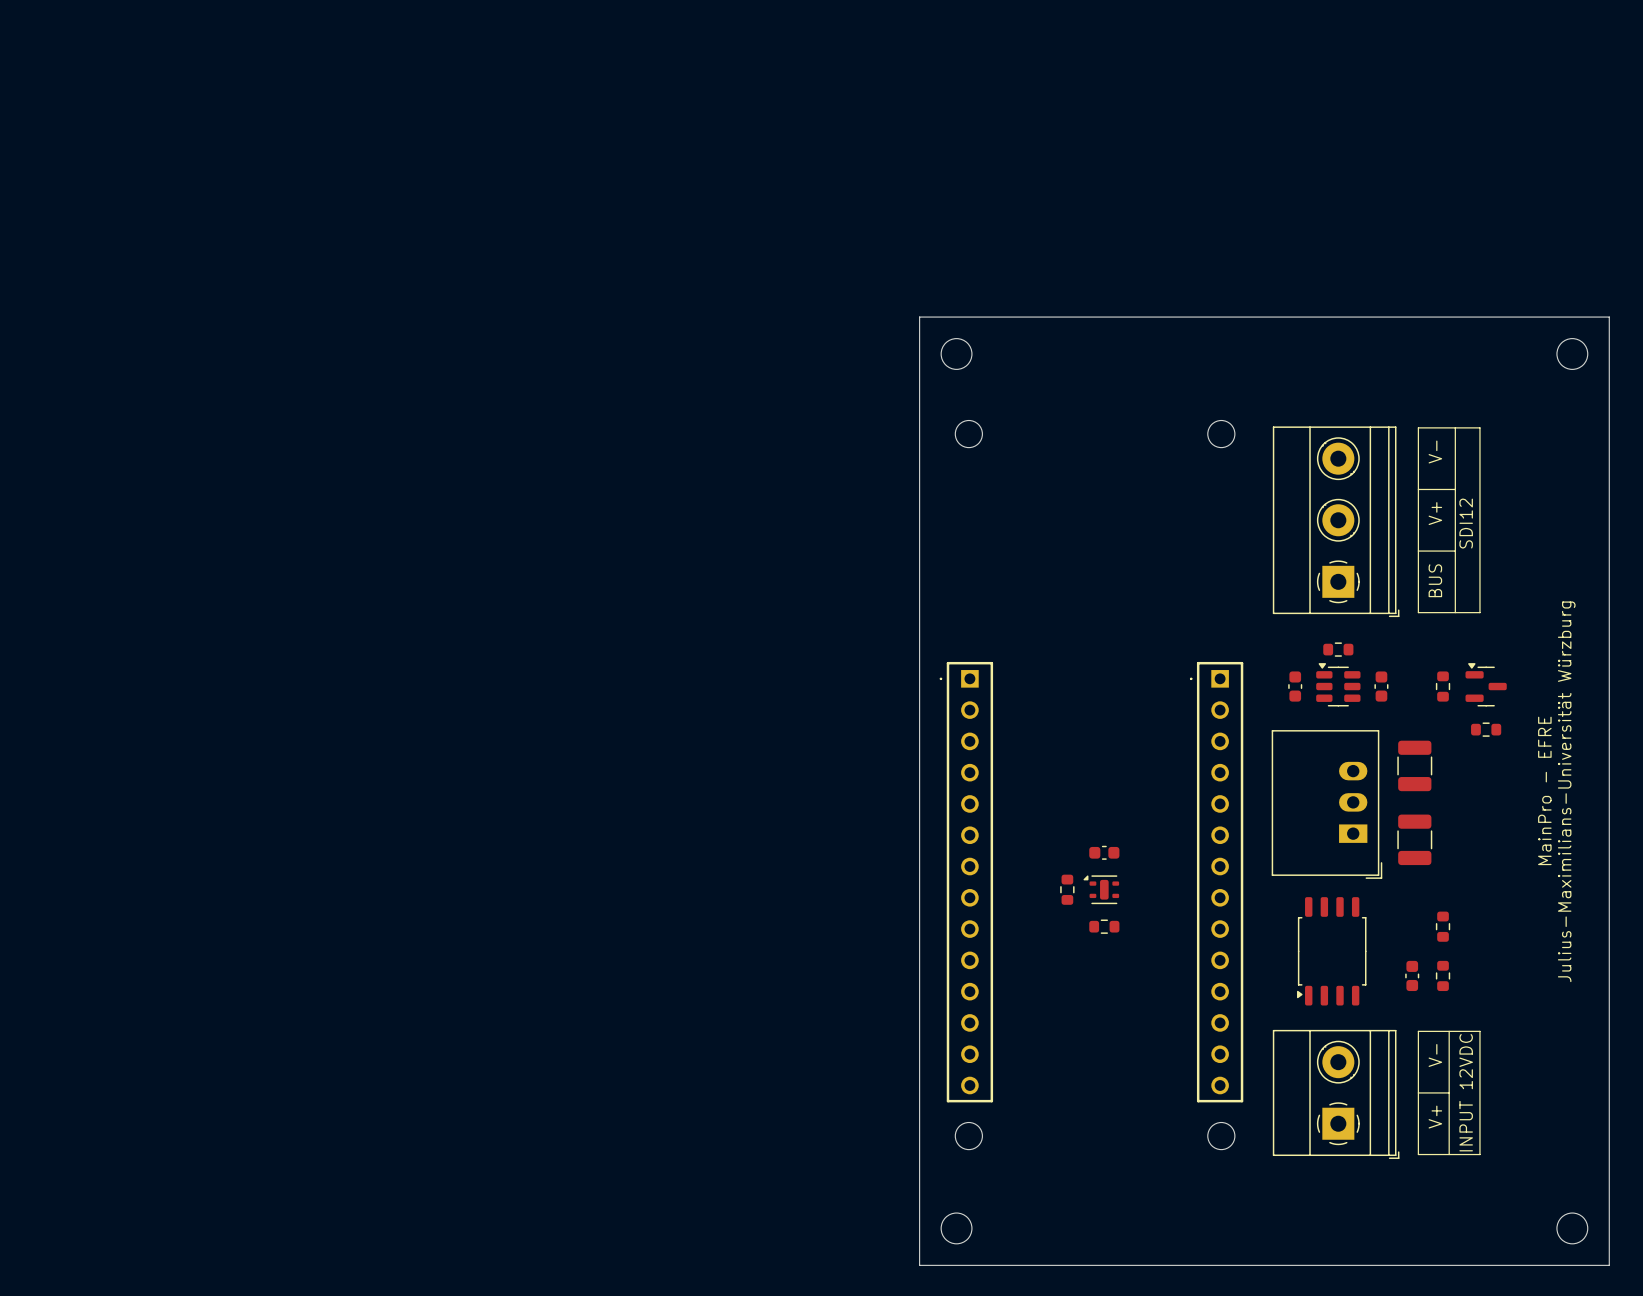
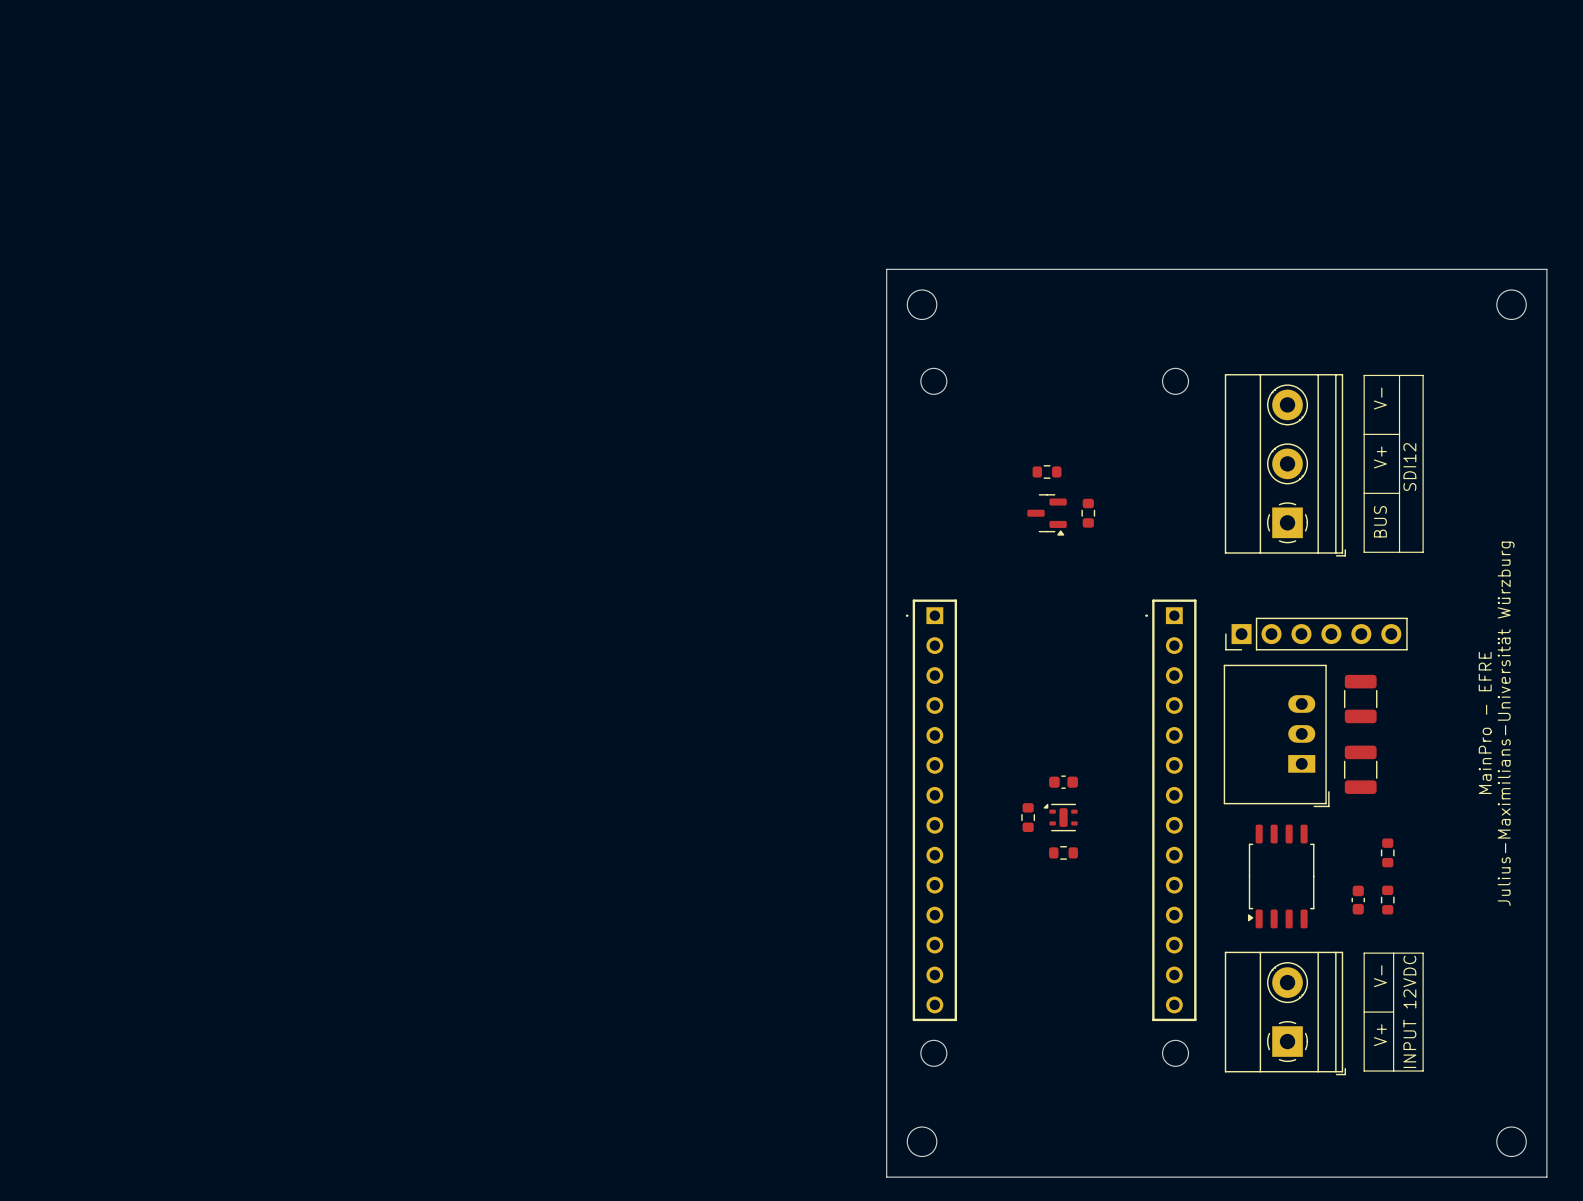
part: none -> (1047, 471)
part: none -> (1088, 513)
part: none -> (1047, 514)
part: (1338, 649) -> none
part: (1338, 684) -> none
part: (1486, 684) -> none
part: (1295, 686) -> none
part: (1381, 686) -> none
part: (1443, 686) -> none
part: none -> (1316, 634)
part: (1486, 729) -> none

